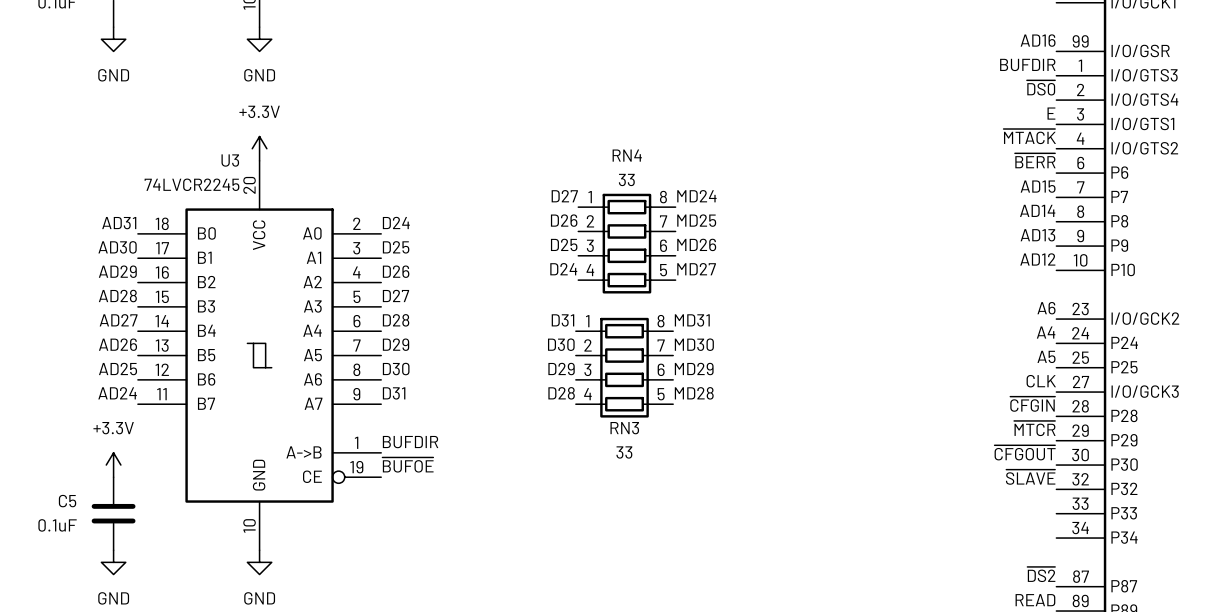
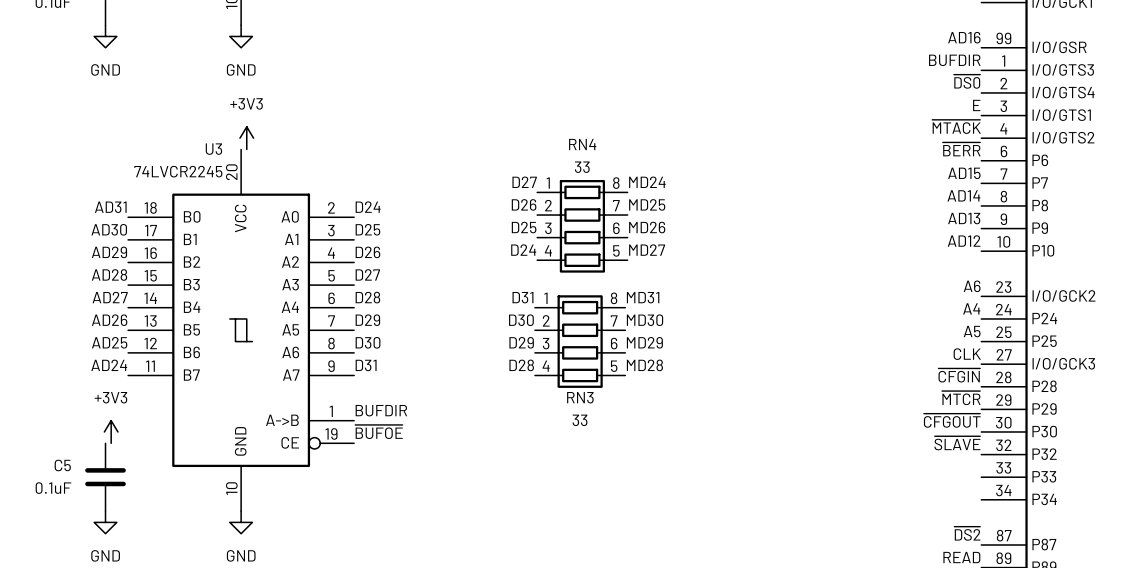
power symbol: +3.3V (259, 148) -> +3V3 (246, 138)
power symbol: +3.3V (113, 465) -> +3V3 (111, 431)

